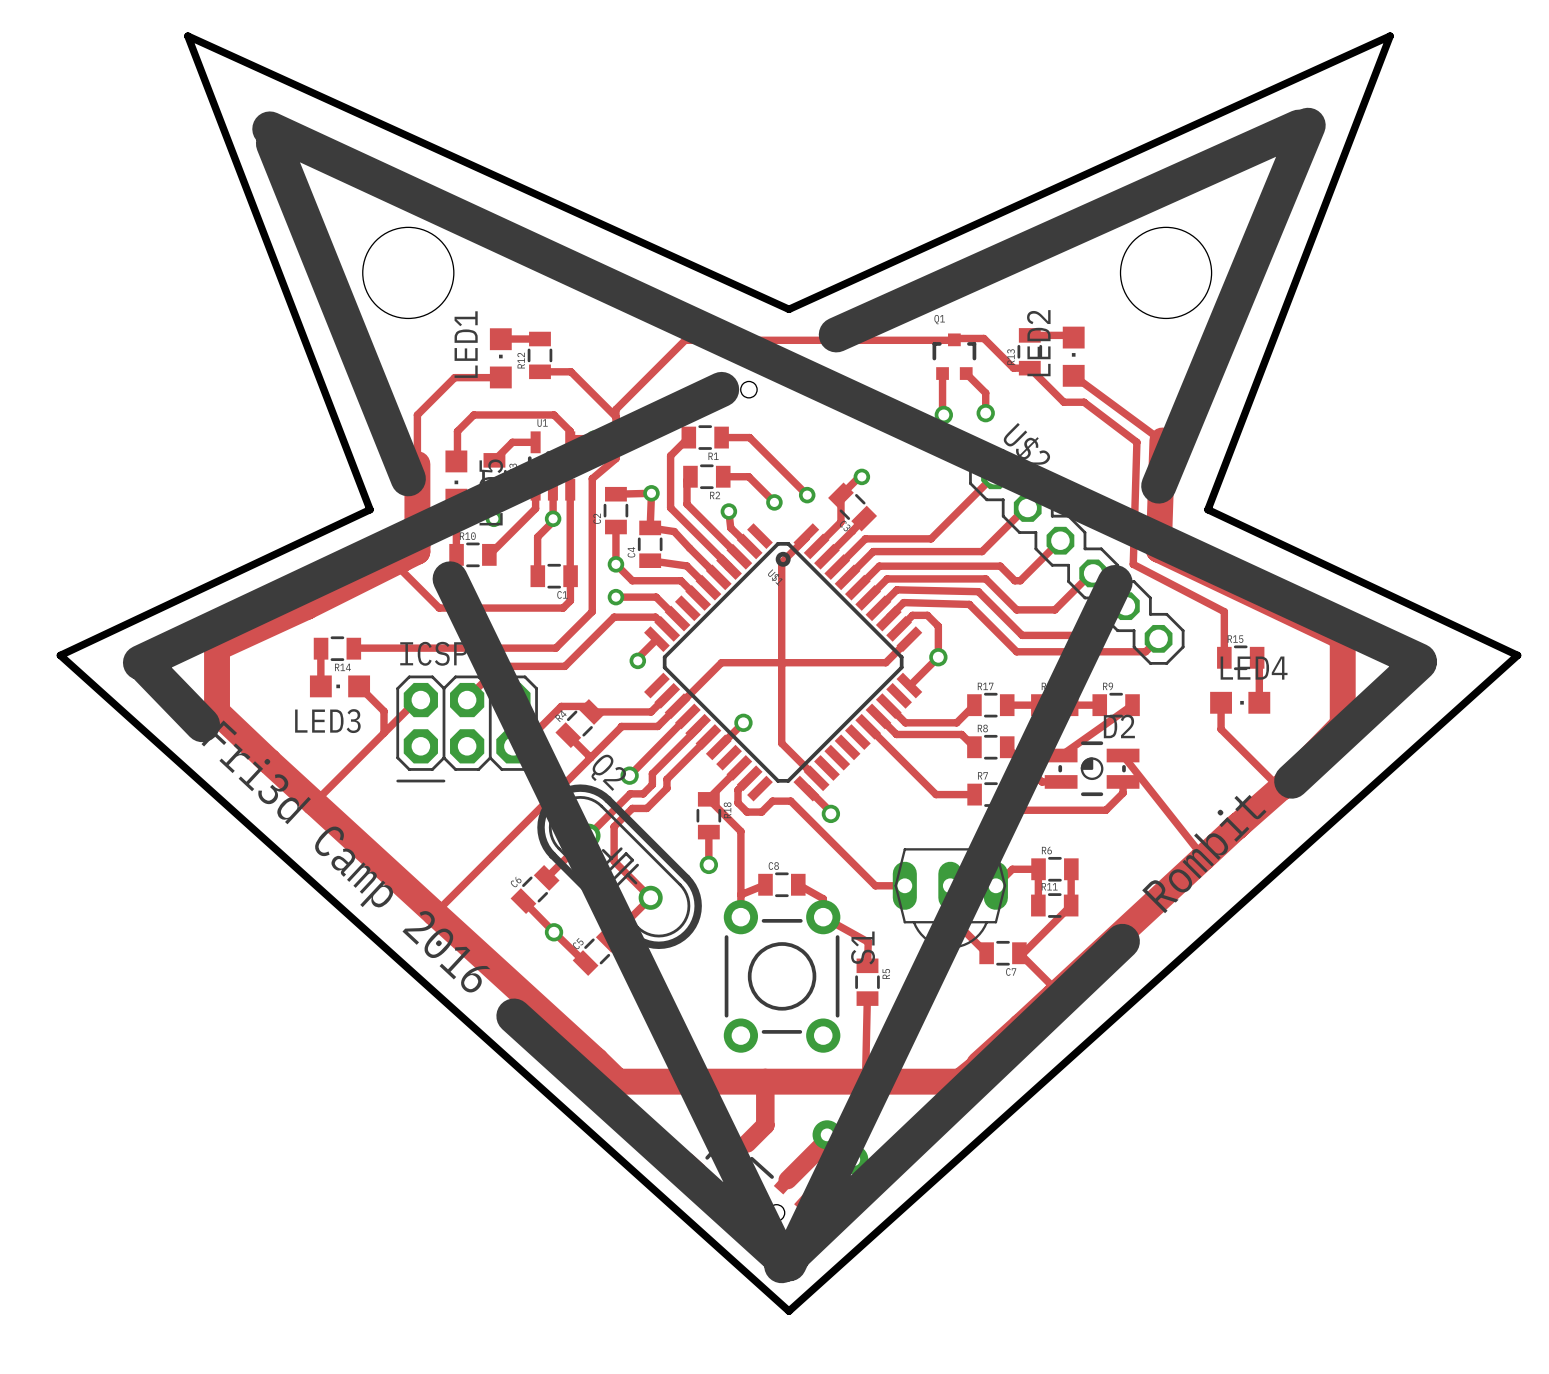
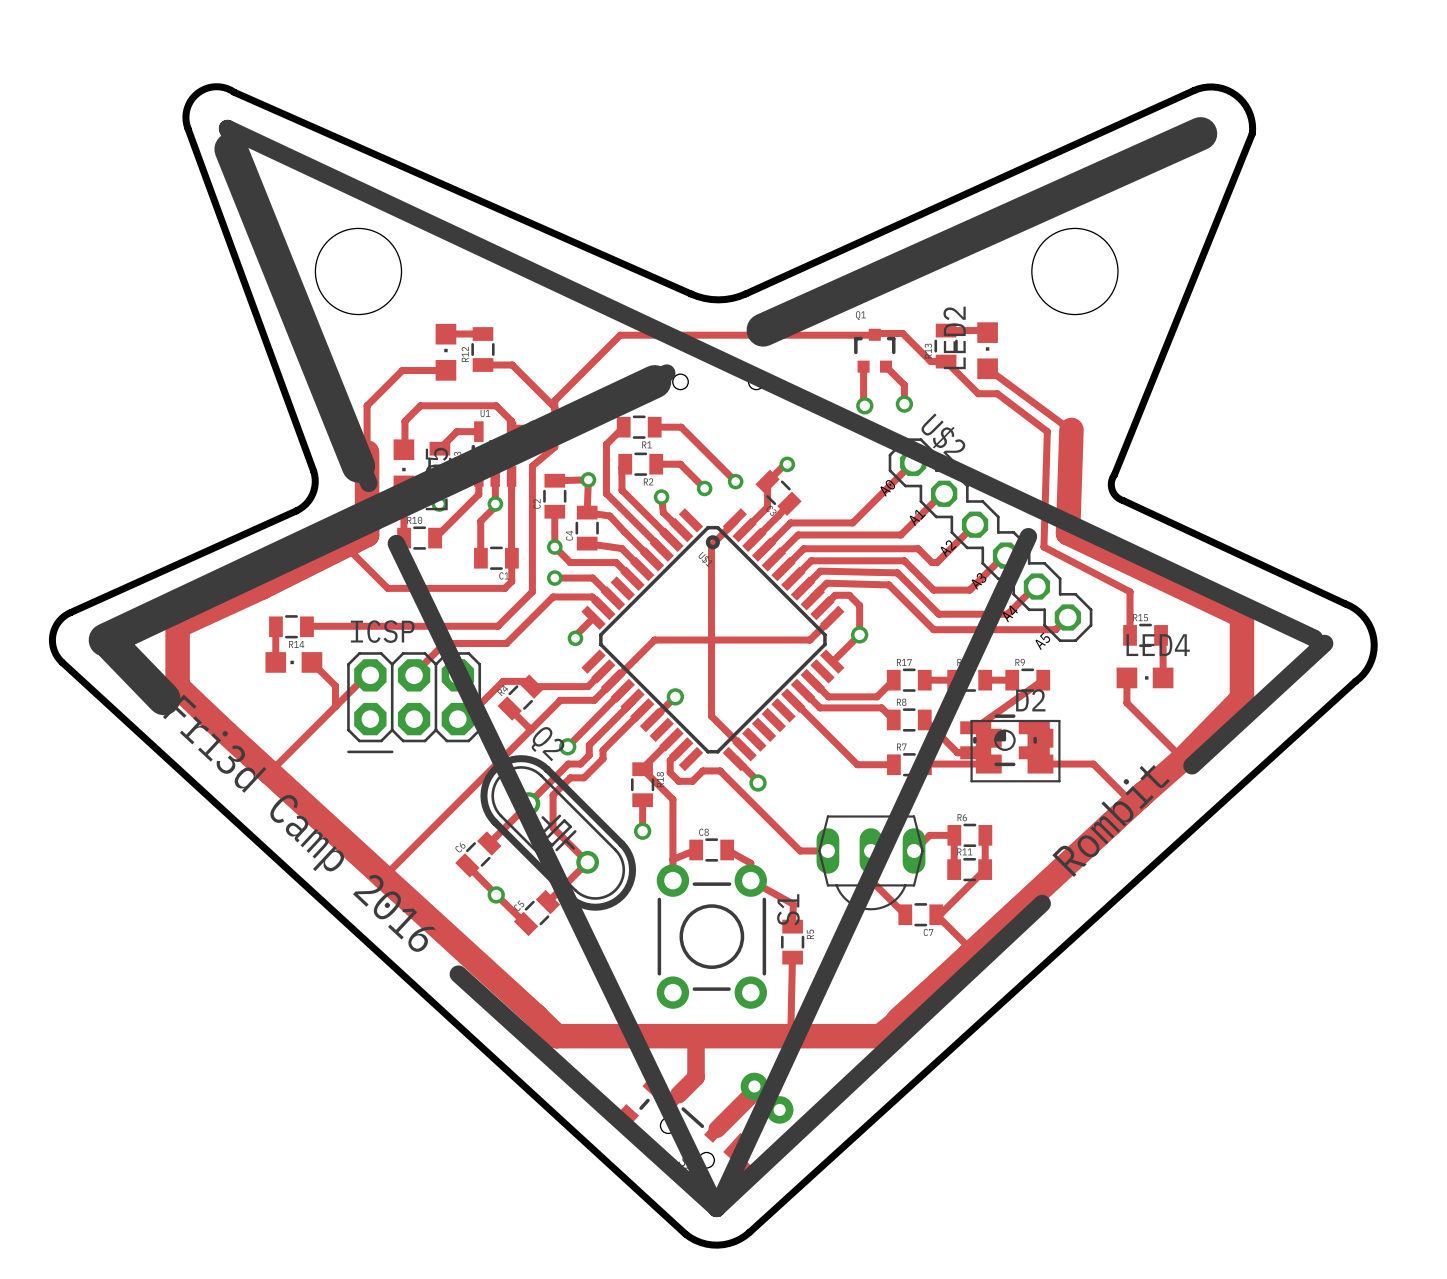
board edge: (187, 36) (370, 509) (60, 655) (788, 1311) (1517, 655) (1207, 509) (1390, 36) (788, 309) (187, 36) -> (1193, 90) (745, 293) (732, 298) (718, 299) (704, 298) (690, 293) (227, 88) (215, 86) (204, 89) (194, 95) (188, 105) (186, 124) (313, 471) (313, 490) (308, 501) (296, 510) (67, 614) (58, 621) (53, 631) (52, 642) (55, 653) (62, 662) (685, 1234) (695, 1240) (712, 1244) (729, 1243) (740, 1239) (1359, 678) (1371, 660) (1374, 644) (1372, 634) (1366, 619) (1354, 608) (1121, 499) (1112, 489) (1112, 478) (1252, 133) (1252, 123) (1248, 109) (1235, 95) (1222, 88) (1212, 86) (1193, 90)
line: (1308, 125) (1158, 486) -> none
line: (269, 129) (1419, 660) -> (368, 483) (227, 128) (1314, 638)
LED1 name: LED1 (466, 344) -> none
text: none -> A0 (887, 488)
text: none -> A1 (917, 517)
line: none -> (1028, 536) (716, 1208)
line: none -> (396, 543) (716, 1208)
text: none -> A2 (948, 548)
line: (450, 578) (779, 1258) -> none
line: (1115, 582) (788, 1263) -> none
text: none -> A3 (979, 581)
text: none -> A4 (1010, 613)
line: (1419, 662) (1291, 781) -> none
text: none -> A5 (1042, 641)
line: none -> (1324, 643) (1192, 765)
LED3 name: LED3 (327, 721) -> none
track: (1123, 755) (1203, 857) -> none
part: none -> (1015, 751)
track: (1123, 781) (1123, 793) (1105, 810) (1023, 810) (1007, 794) -> (988, 764) (924, 764)
track: none -> (1040, 764) (1093, 764) (1132, 803)
line: (1122, 941) (781, 1265) -> none
line: none -> (1042, 903) (716, 1208)
line width: thick (513, 1016) (787, 1263) -> thin (458, 974) (716, 1208)

